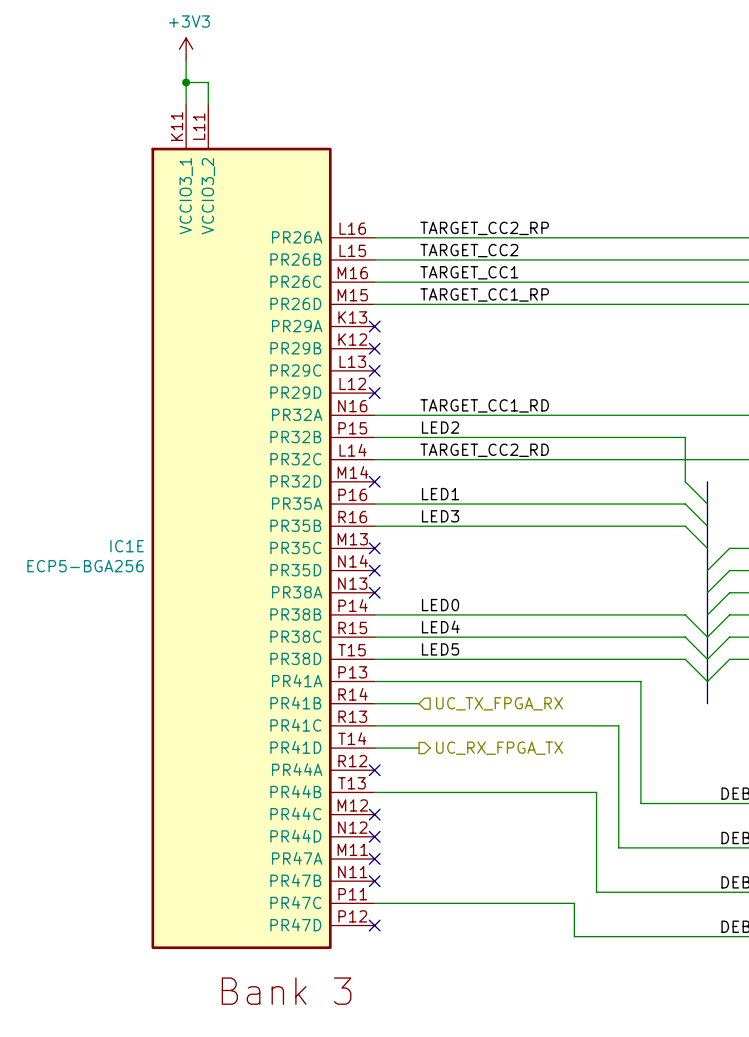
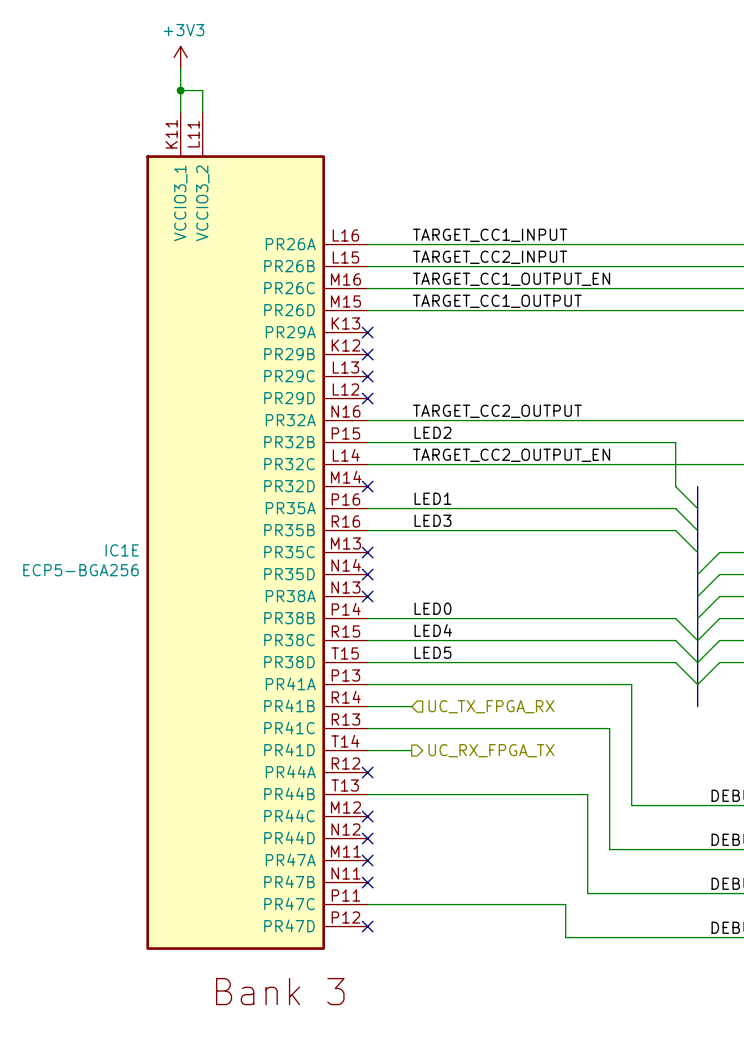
label: TARGET_CC2_RP (484, 228) -> TARGET_CC1_INPUT (490, 235)
label: TARGET_CC2 (469, 250) -> TARGET_CC2_INPUT (490, 257)
label: TARGET_CC1 (469, 272) -> TARGET_CC1_OUTPUT_EN (511, 279)
label: TARGET_CC1_RP (484, 294) -> TARGET_CC1_OUTPUT (497, 301)
label: TARGET_CC1_RD (484, 405) -> TARGET_CC2_OUTPUT (497, 411)
label: TARGET_CC2_RD (484, 450) -> TARGET_CC2_OUTPUT_EN (511, 455)

